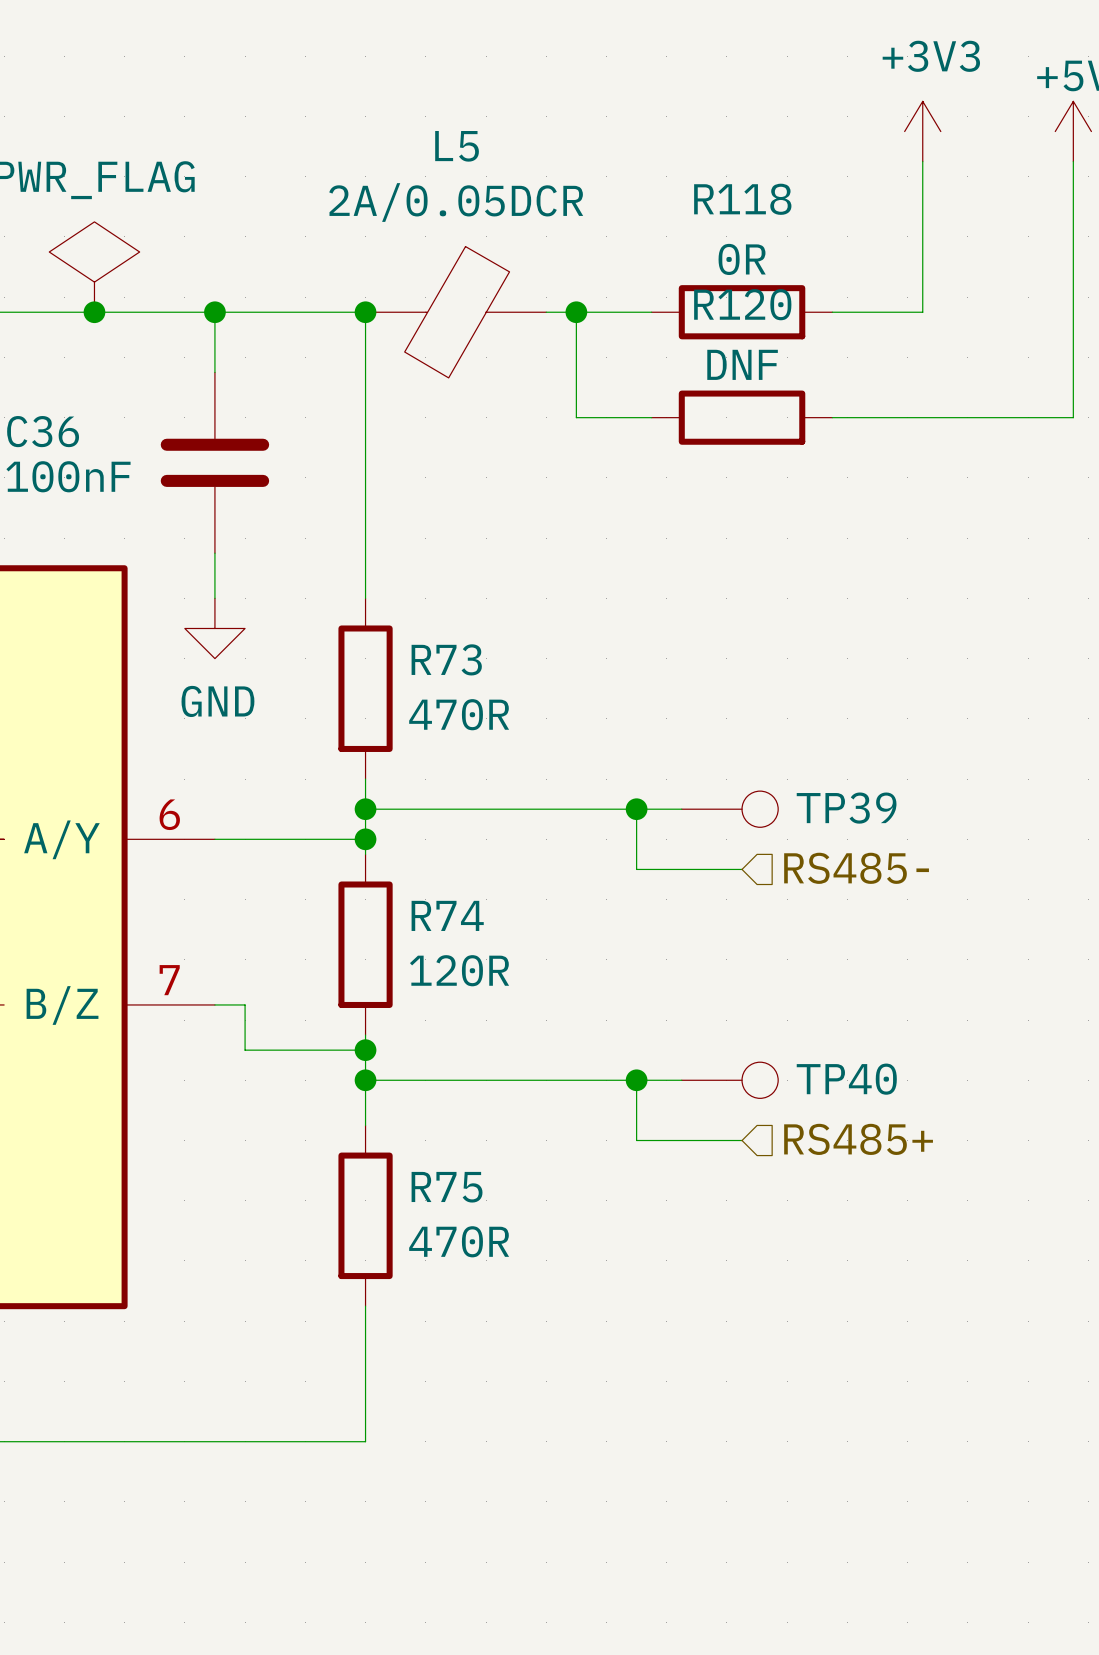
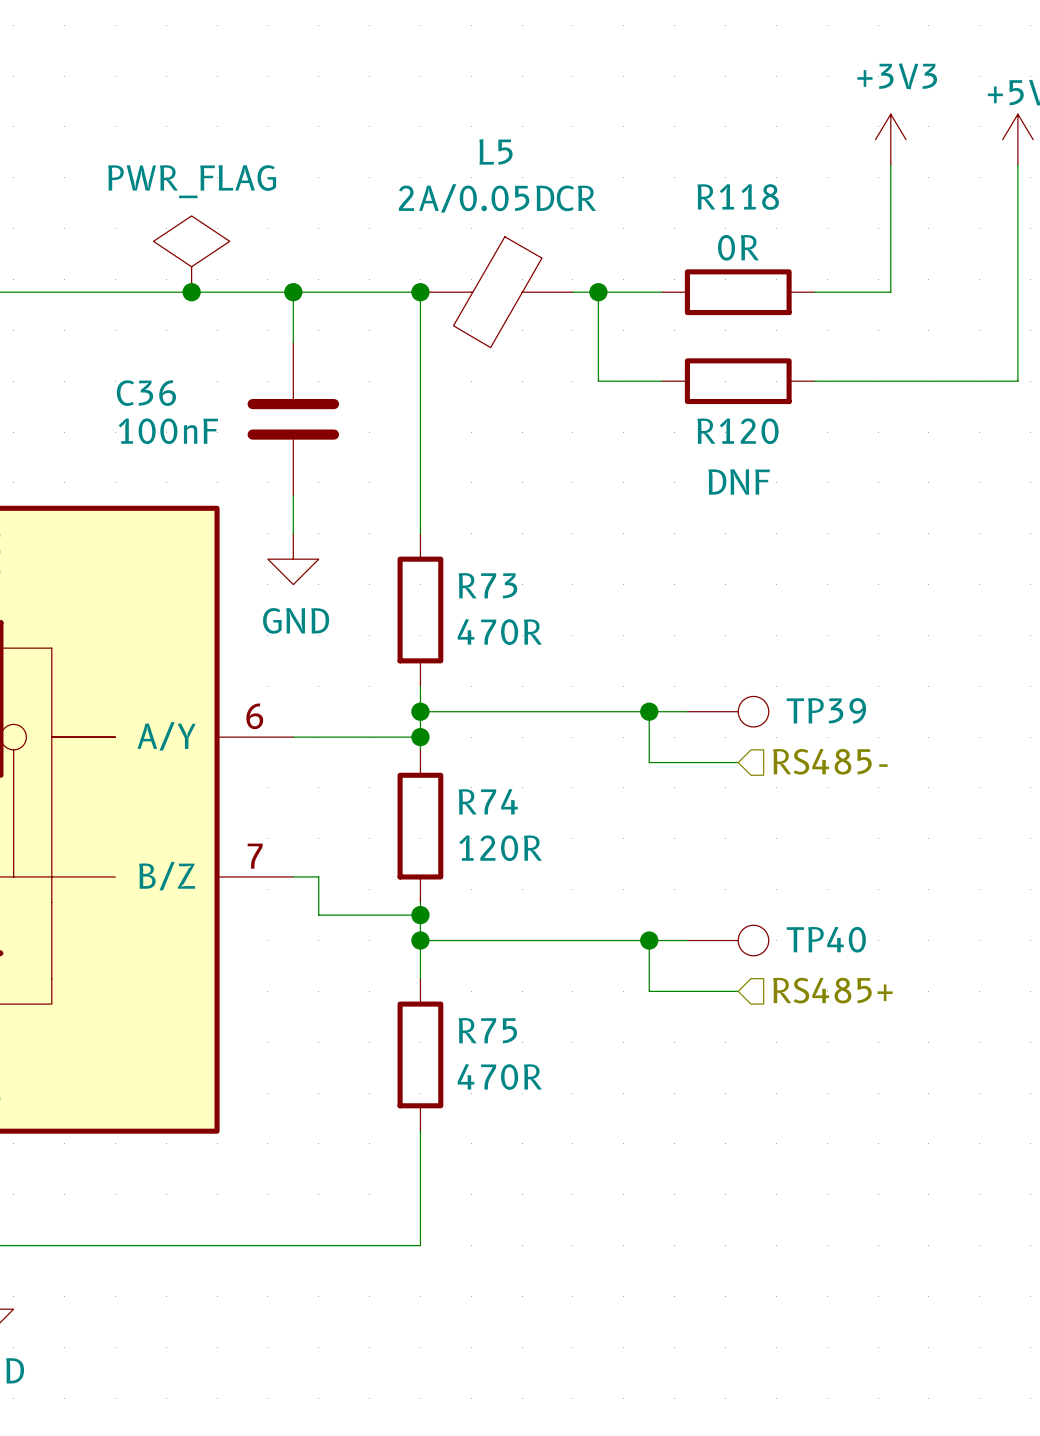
R120 name position: R120 (742, 304) -> R120 (737, 431)
R120 value position: DNF (742, 364) -> DNF (739, 481)

